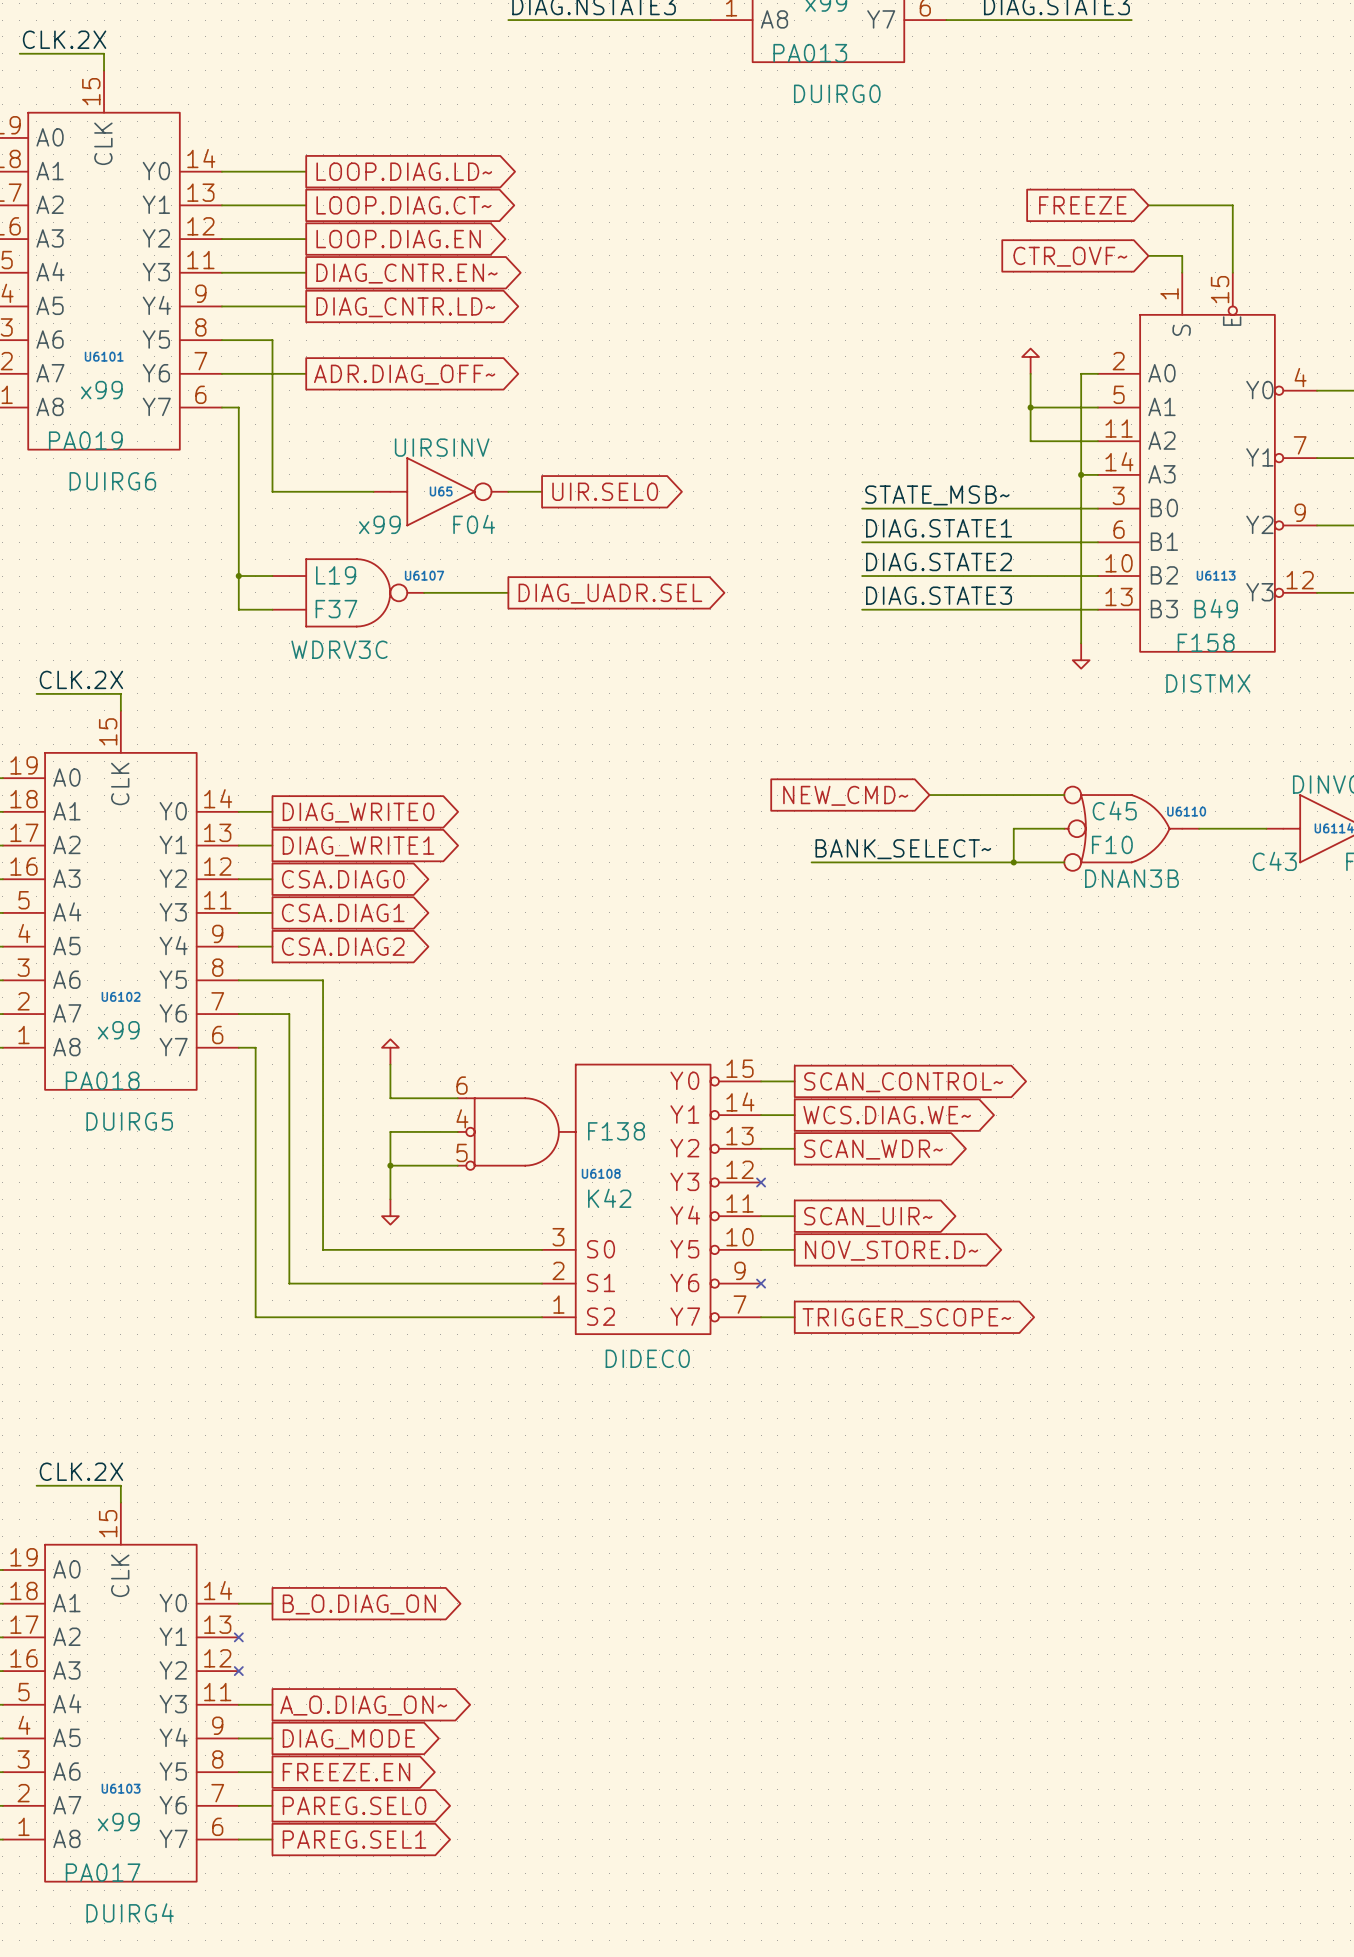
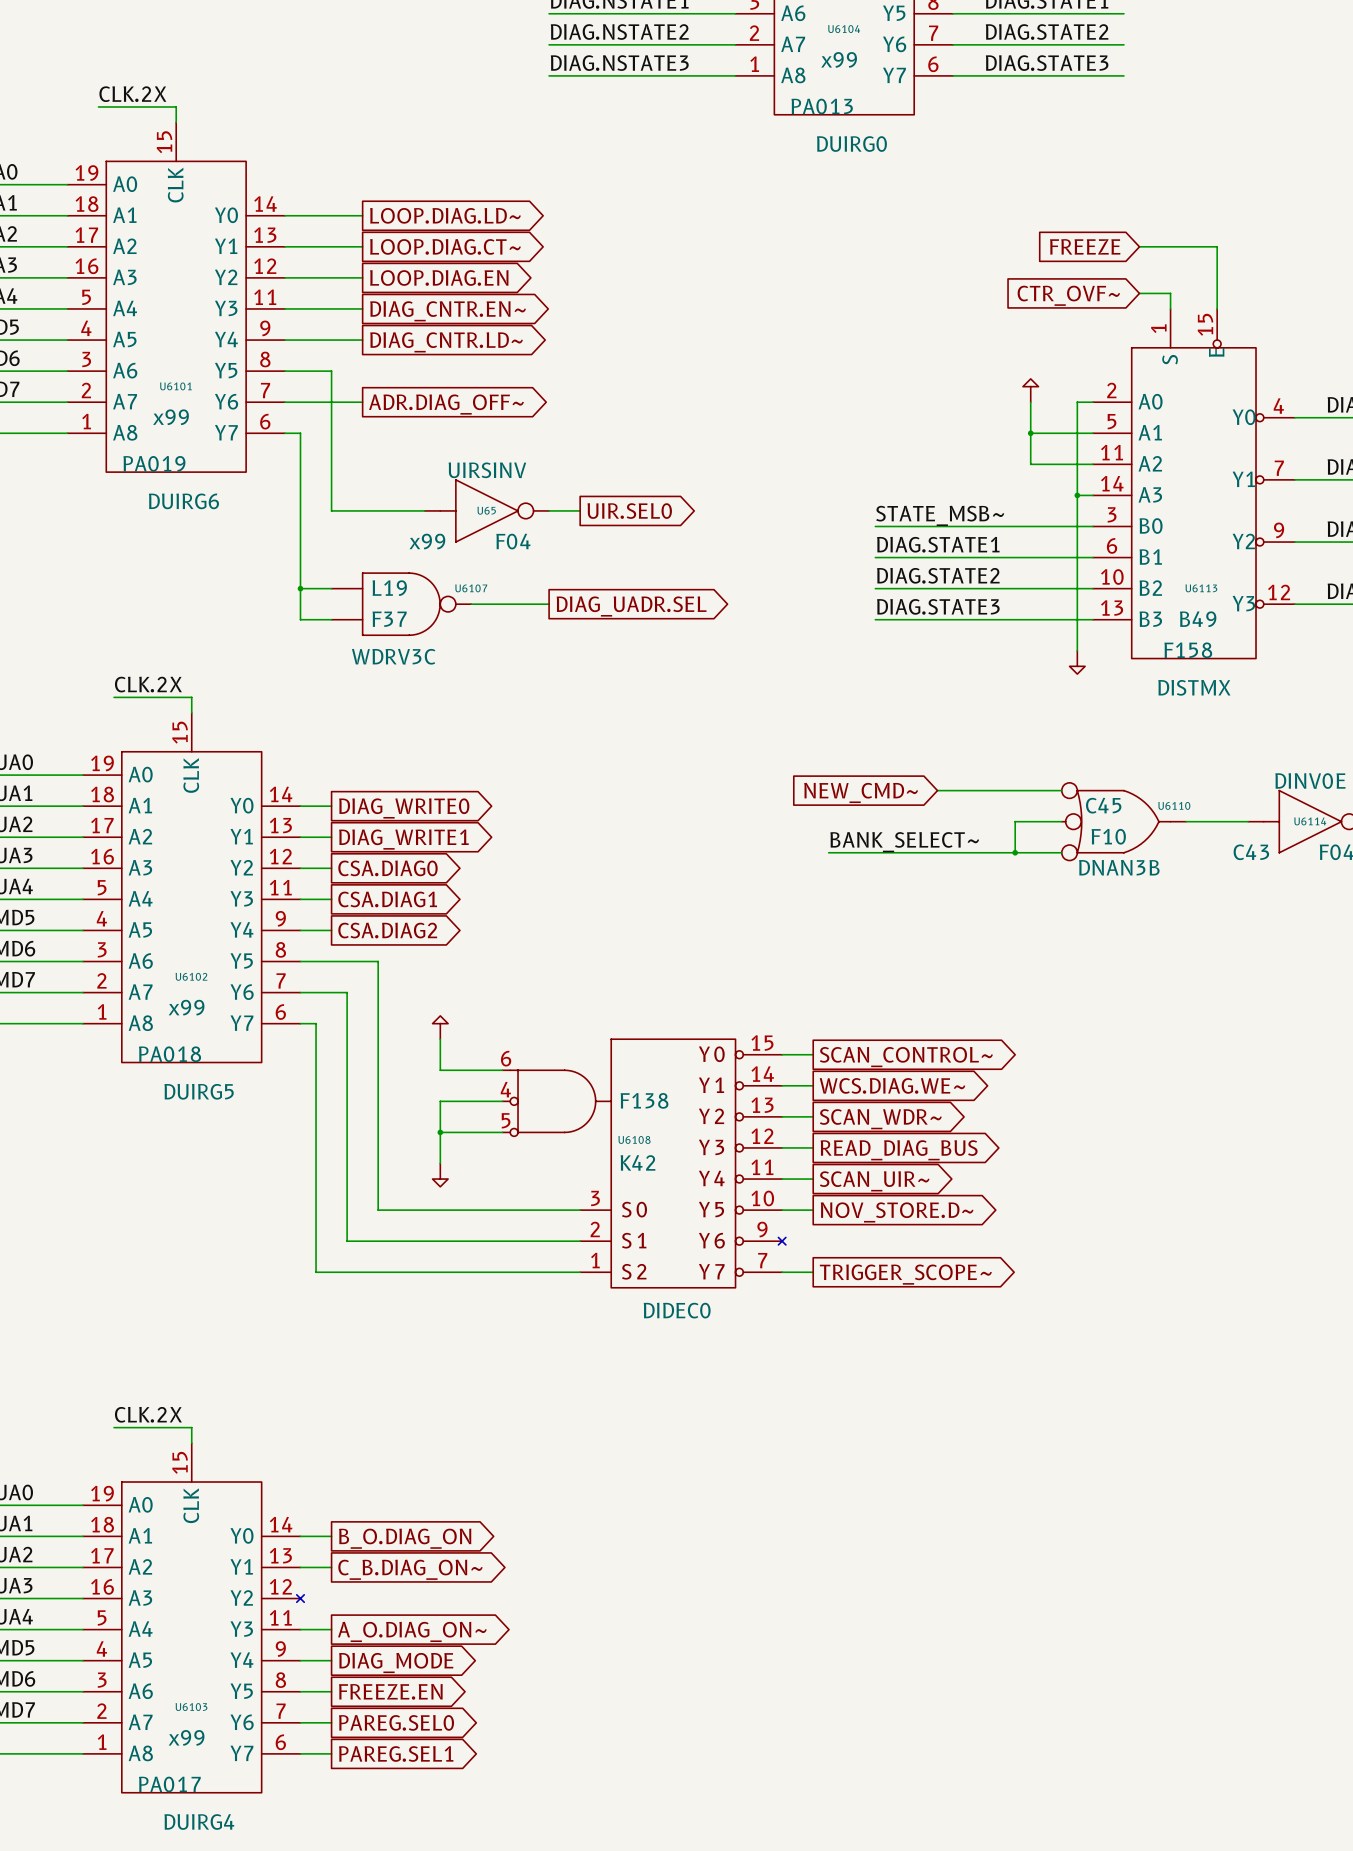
wire: none -> (782, 1147) (813, 1147)
no-connect mark: (761, 1182) -> none
global label: none -> READ_DIAG_BUS (899, 1150)
wire: none -> (300, 1567) (331, 1567)
no-connect mark: (238, 1637) -> none
global label: none -> C_B.DIAG_ON~ (410, 1569)

